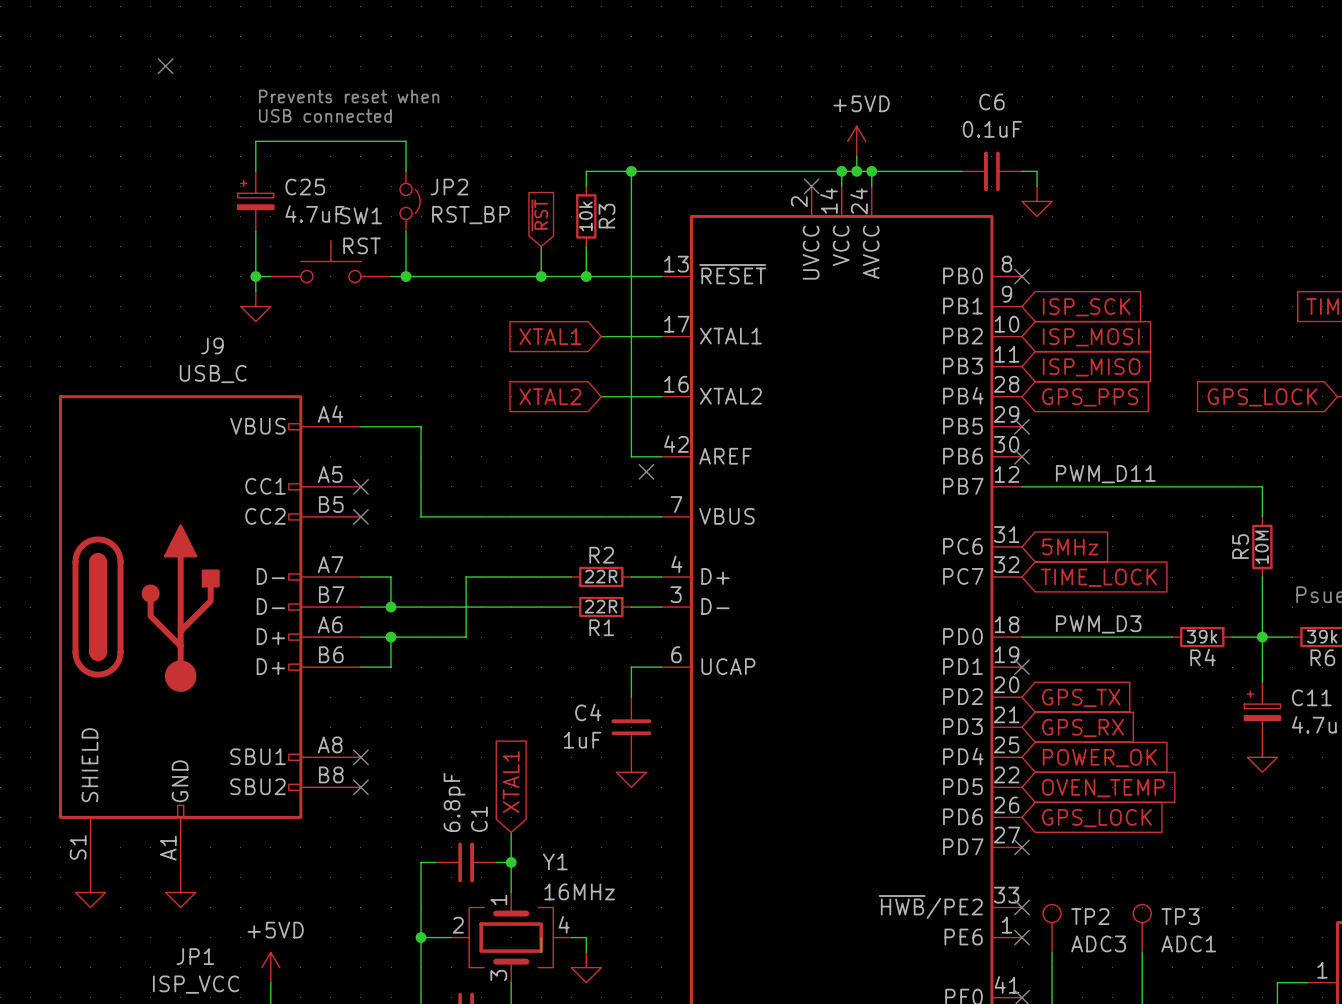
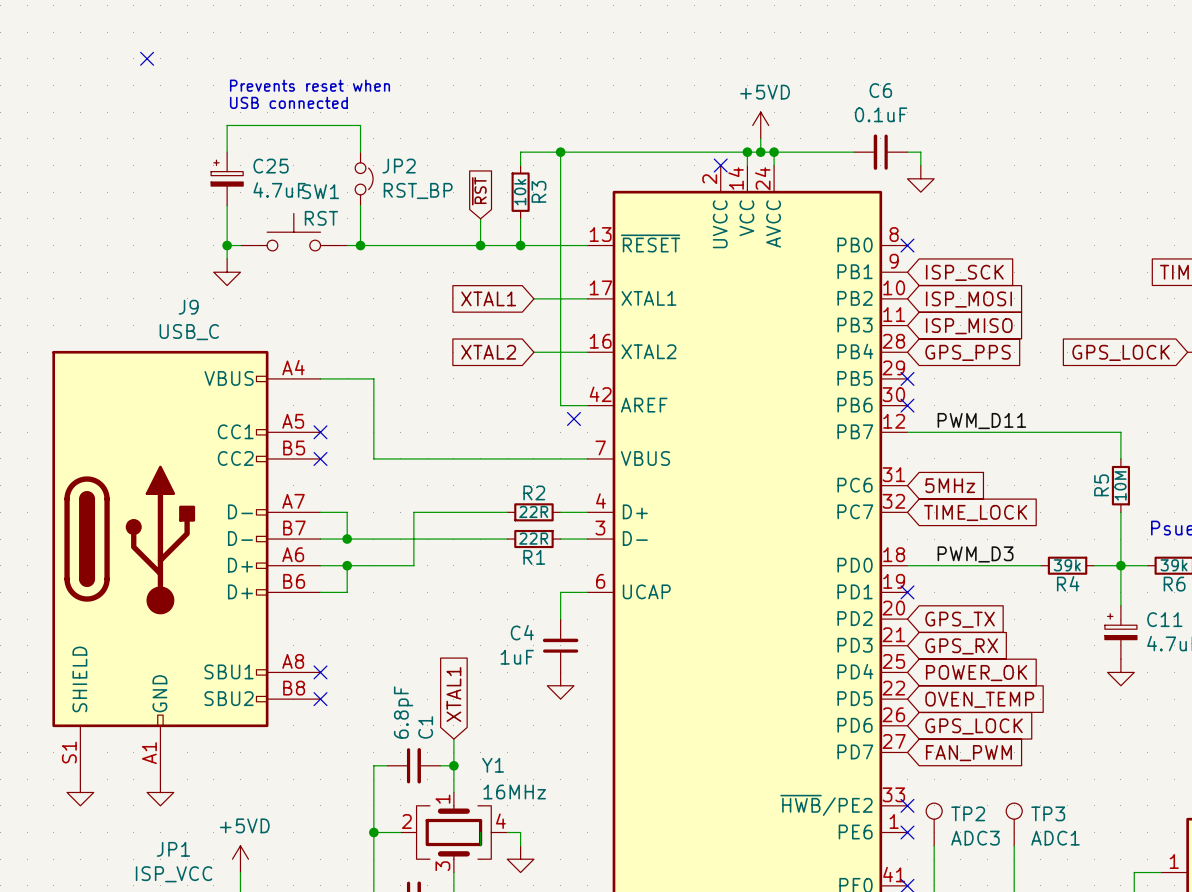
no-connect mark: (1022, 847) -> none
global label: none -> FAN_PWM (968, 753)

